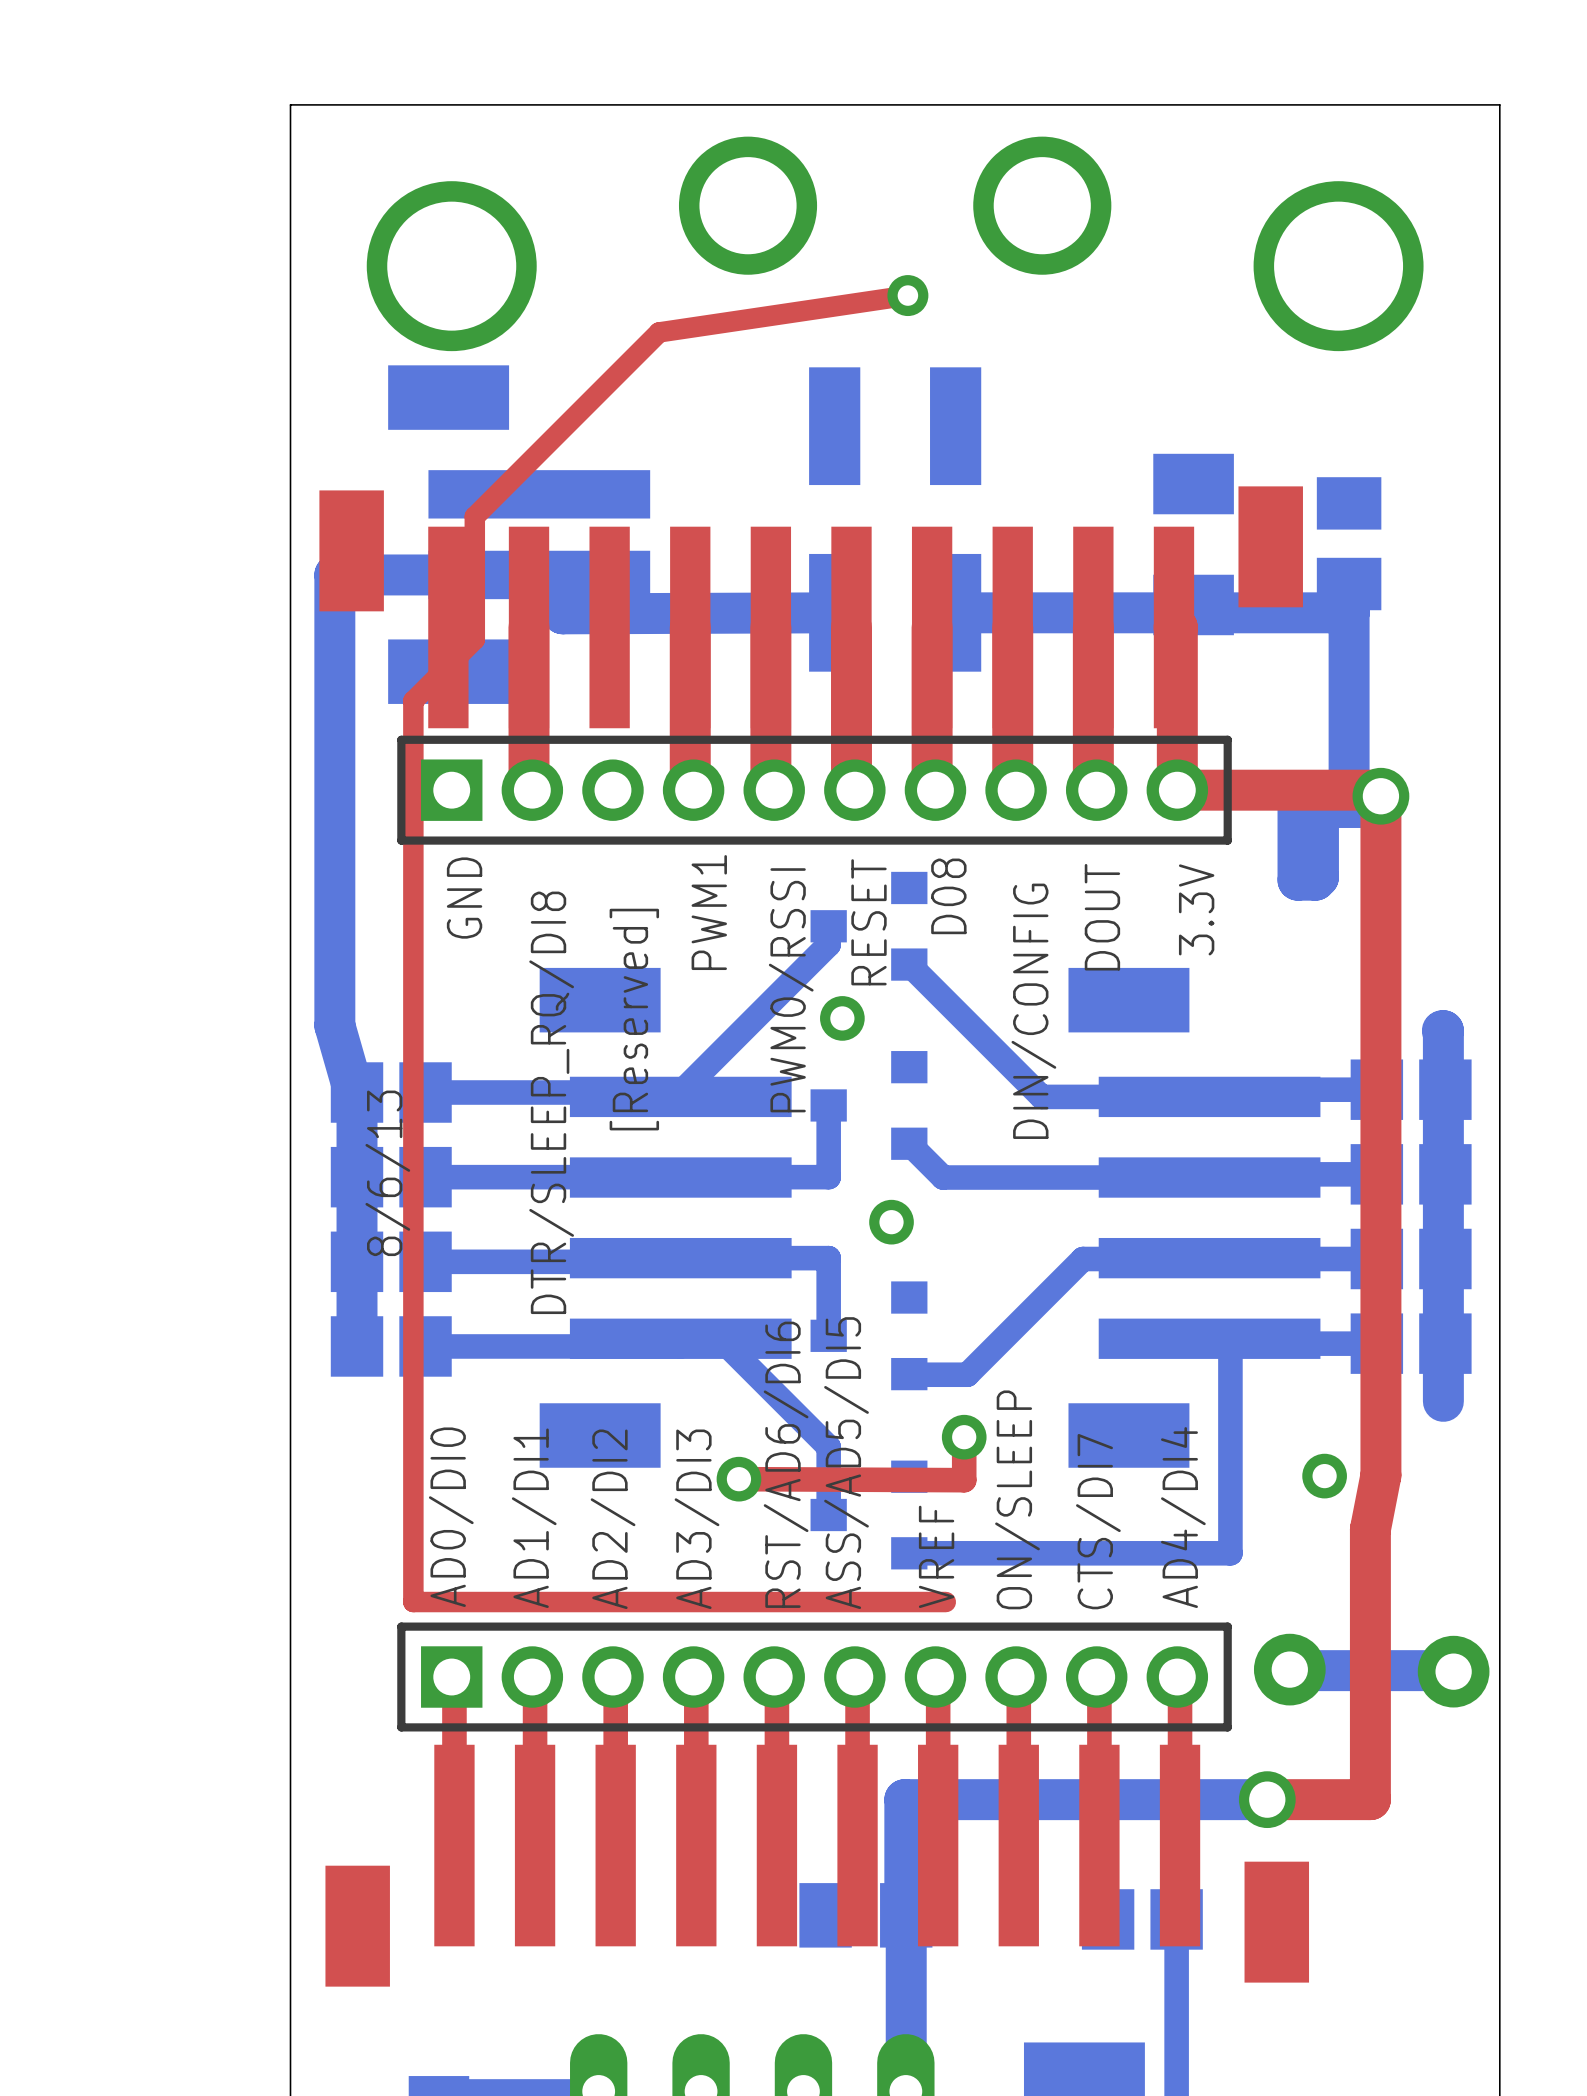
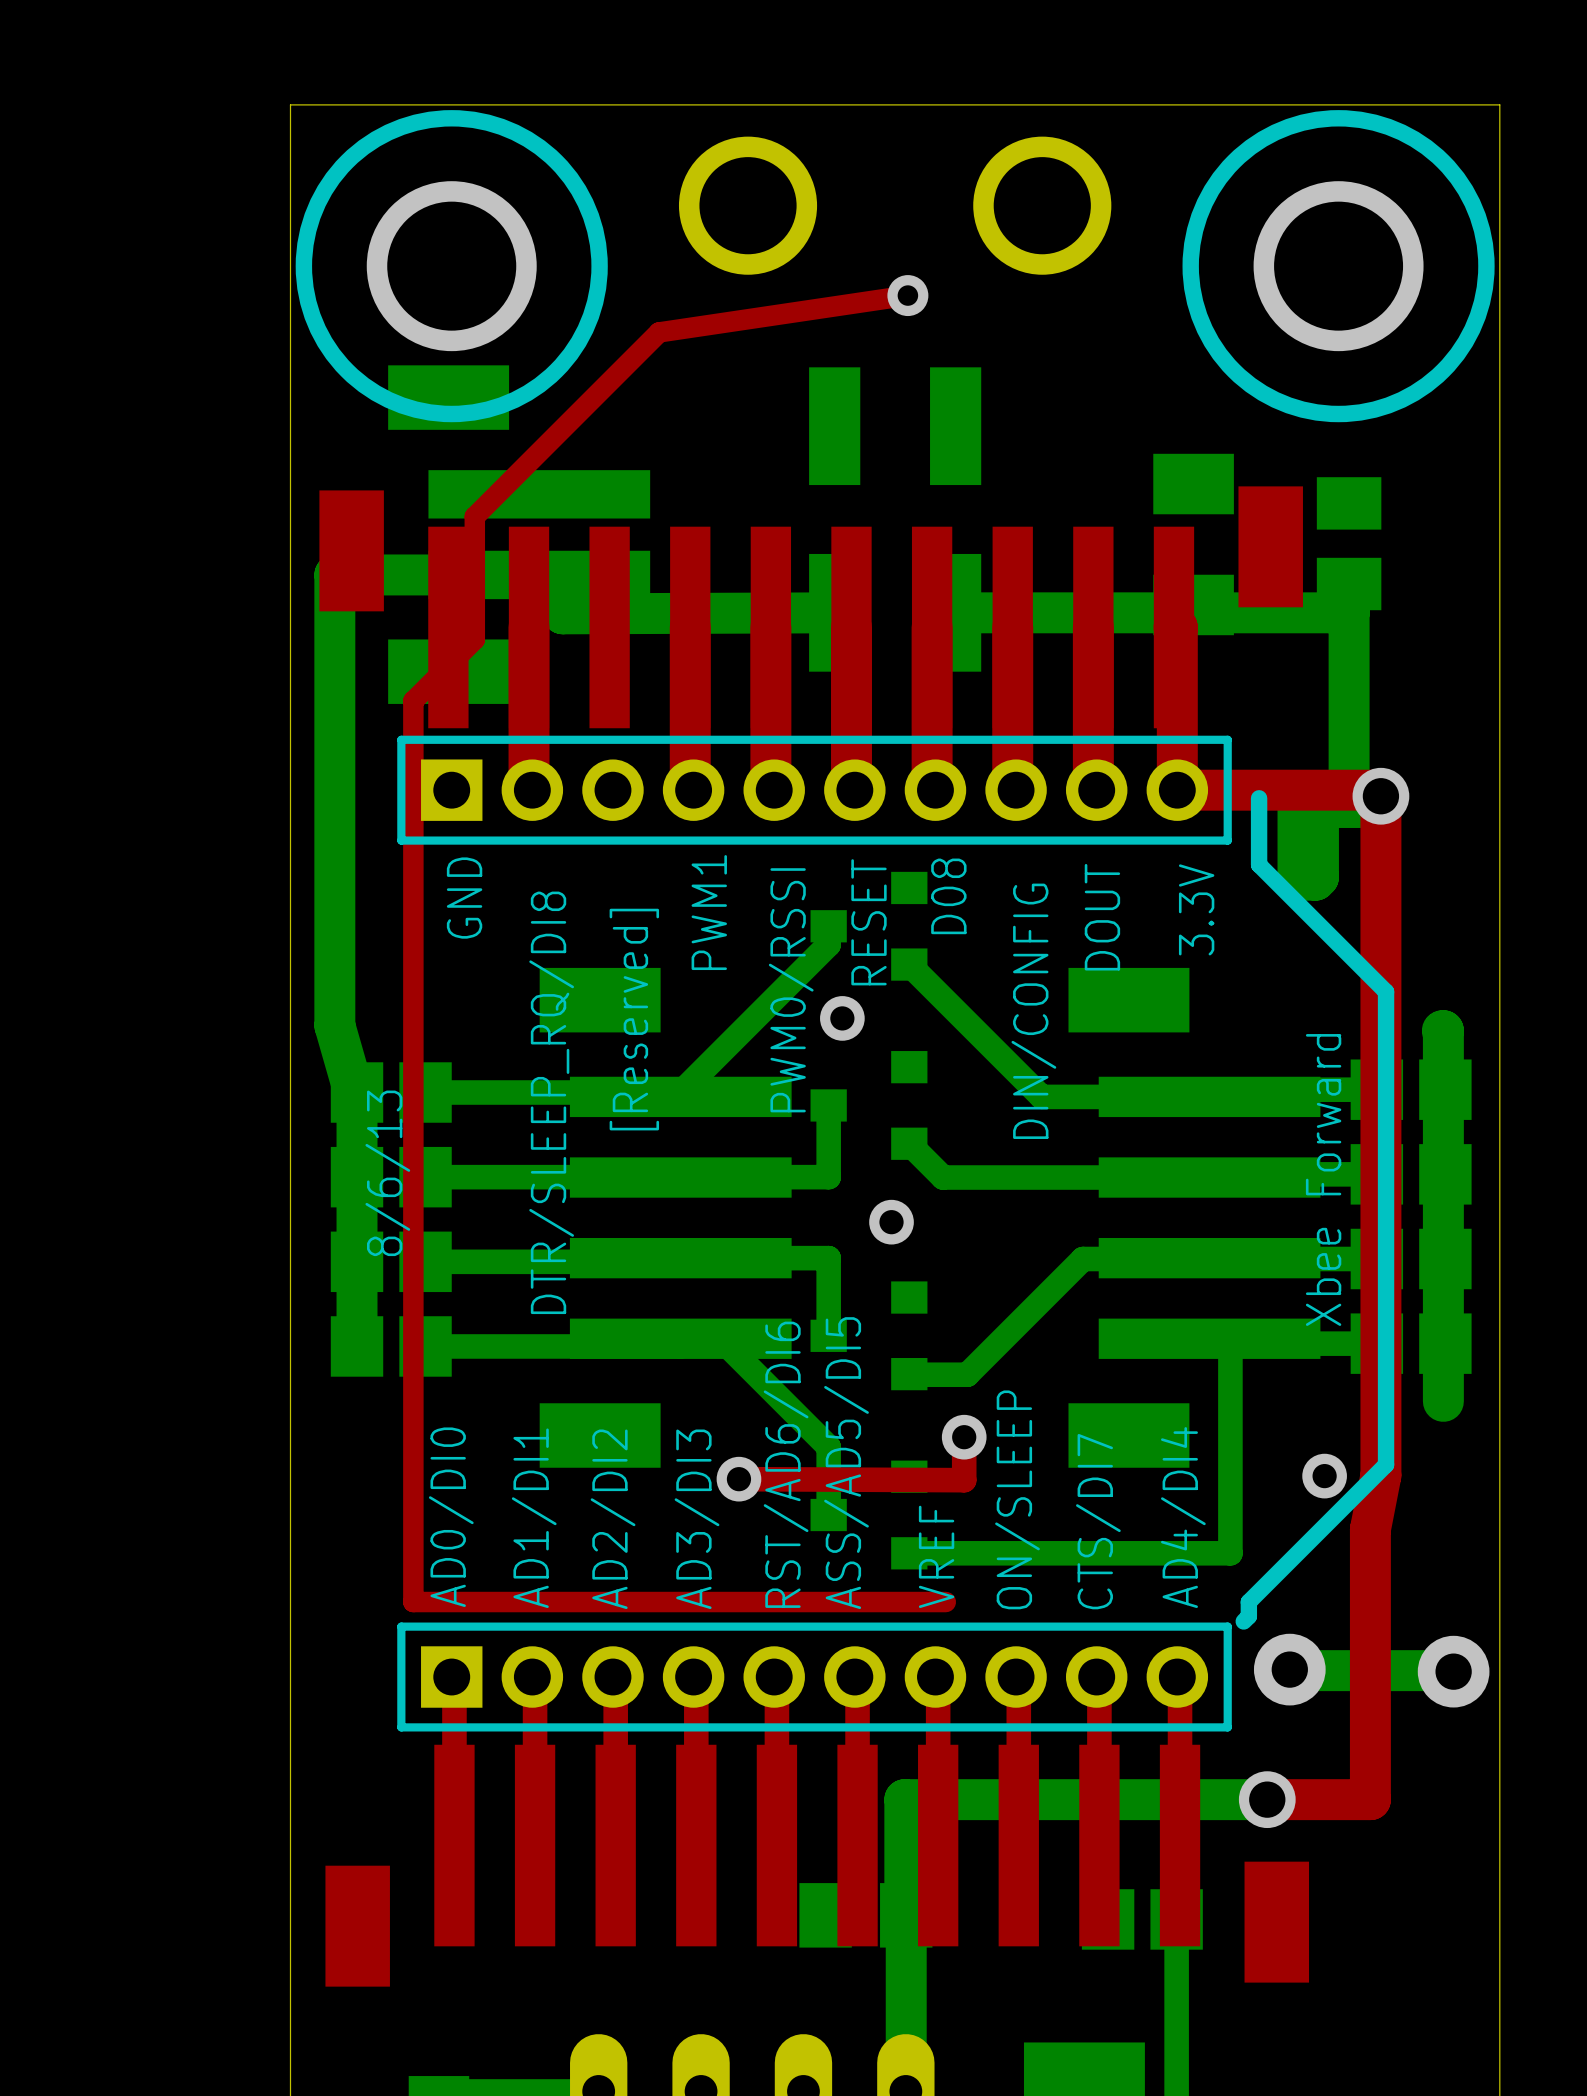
drawing: none -> [295, 110, 608, 423]
drawing: none -> [1182, 110, 1495, 423]
line: none -> (1259, 798) (1259, 864) (1386, 991) (1386, 1464) (1248, 1602) (1248, 1616) (1243, 1621)
text: none -> Xbee Forward (1323, 1179)

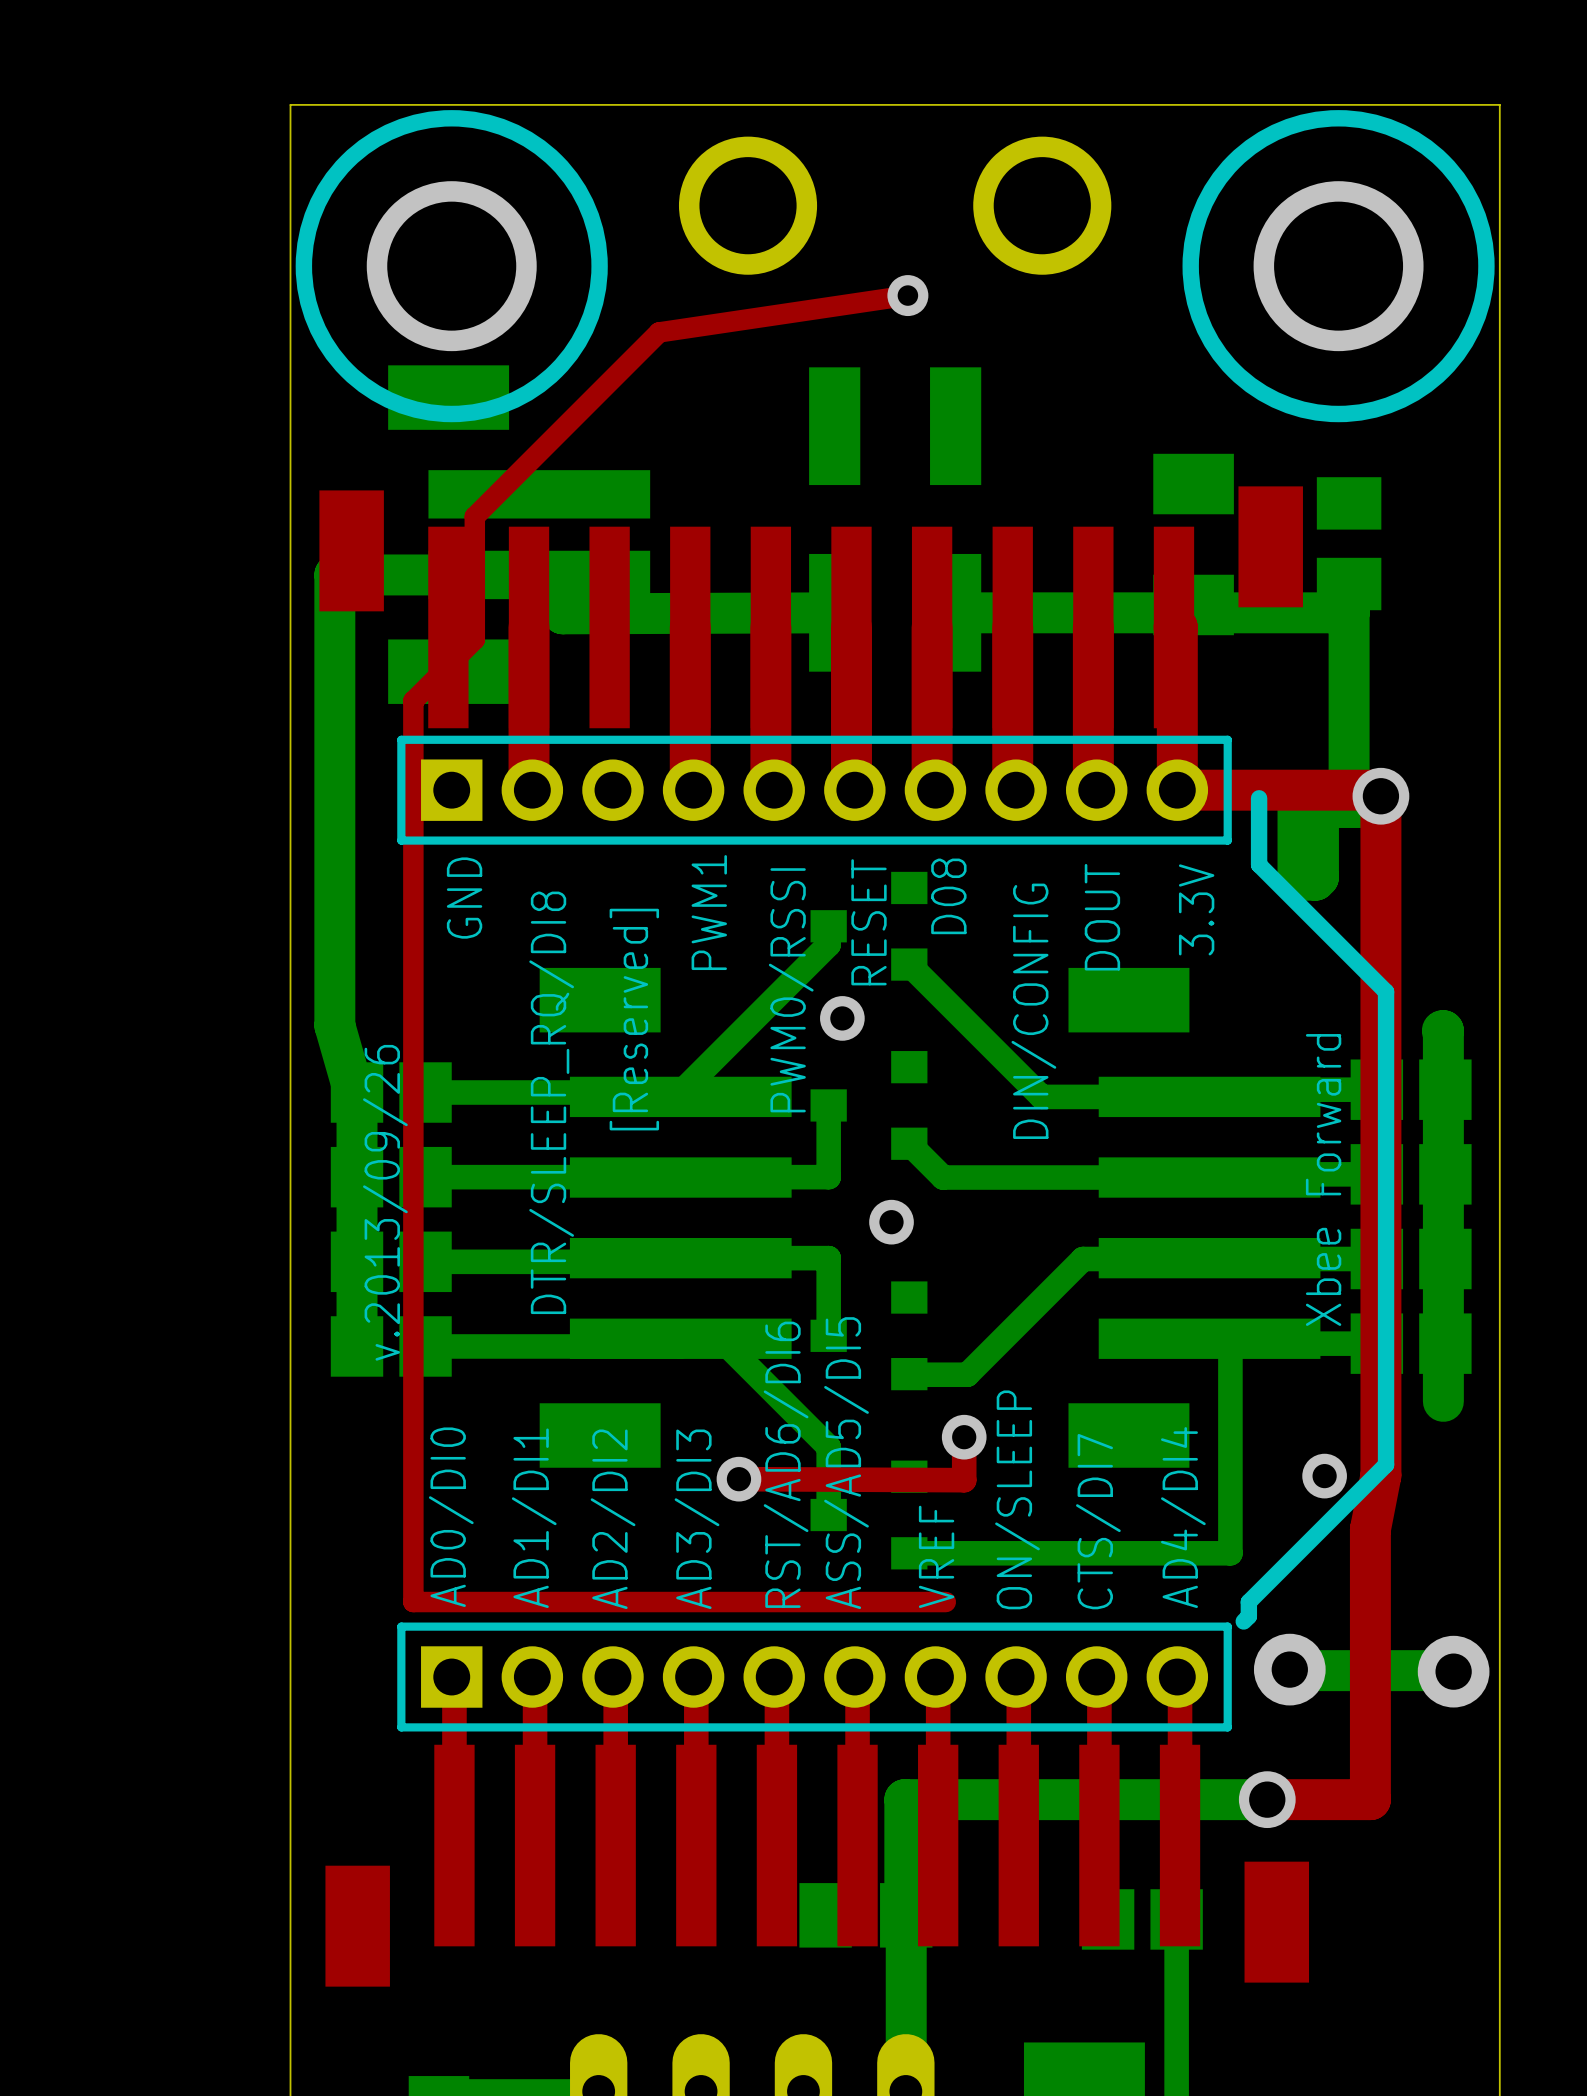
text: 8/6/13 (387, 1173) -> none
text: none -> v.2013/09/26 (385, 1202)

